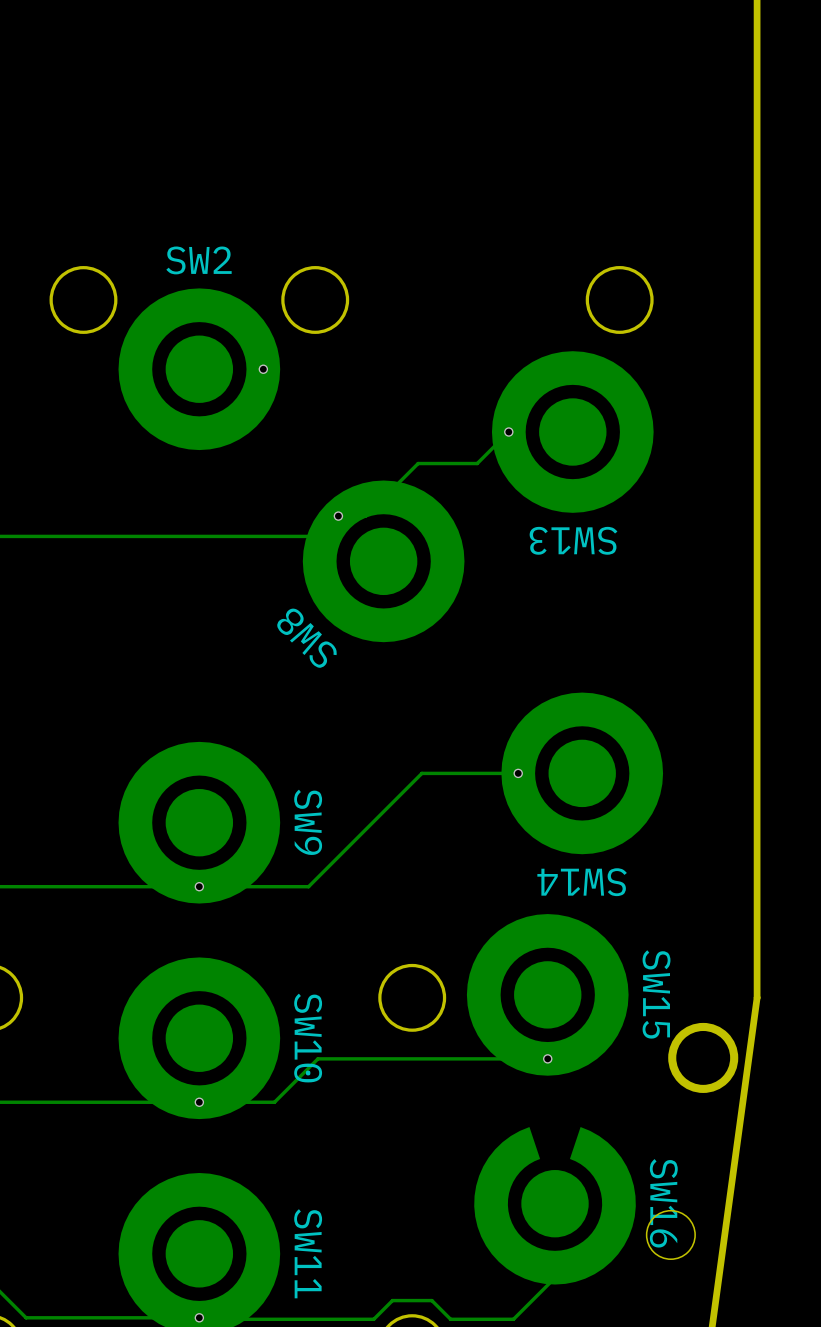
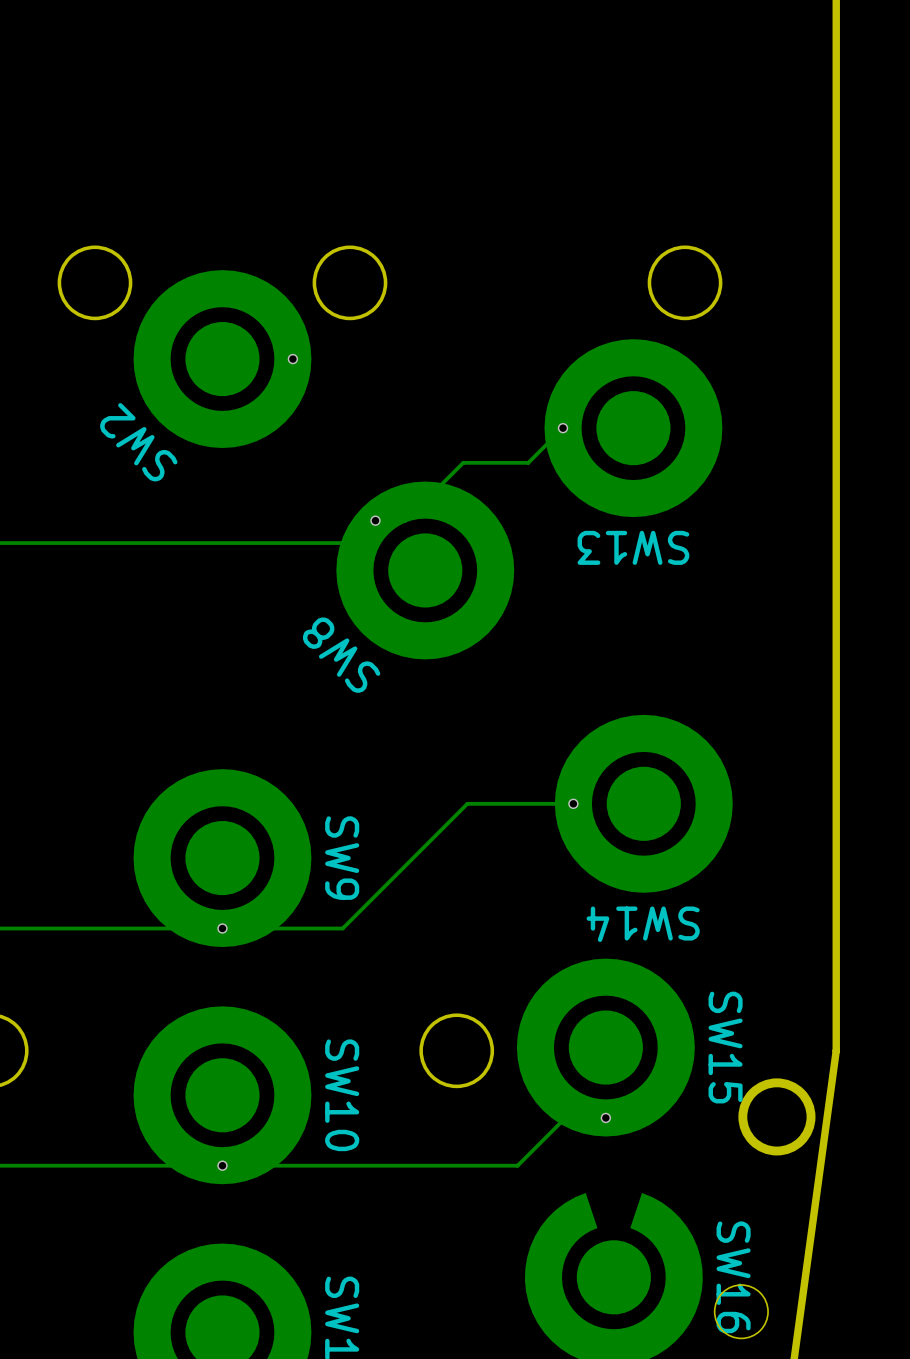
SW2 rotation: 0° (199, 369) -> 135° counterclockwise (222, 359)
track: (510, 1058) (317, 1058) (274, 1102) -> (565, 1117) (517, 1165) (305, 1165)

